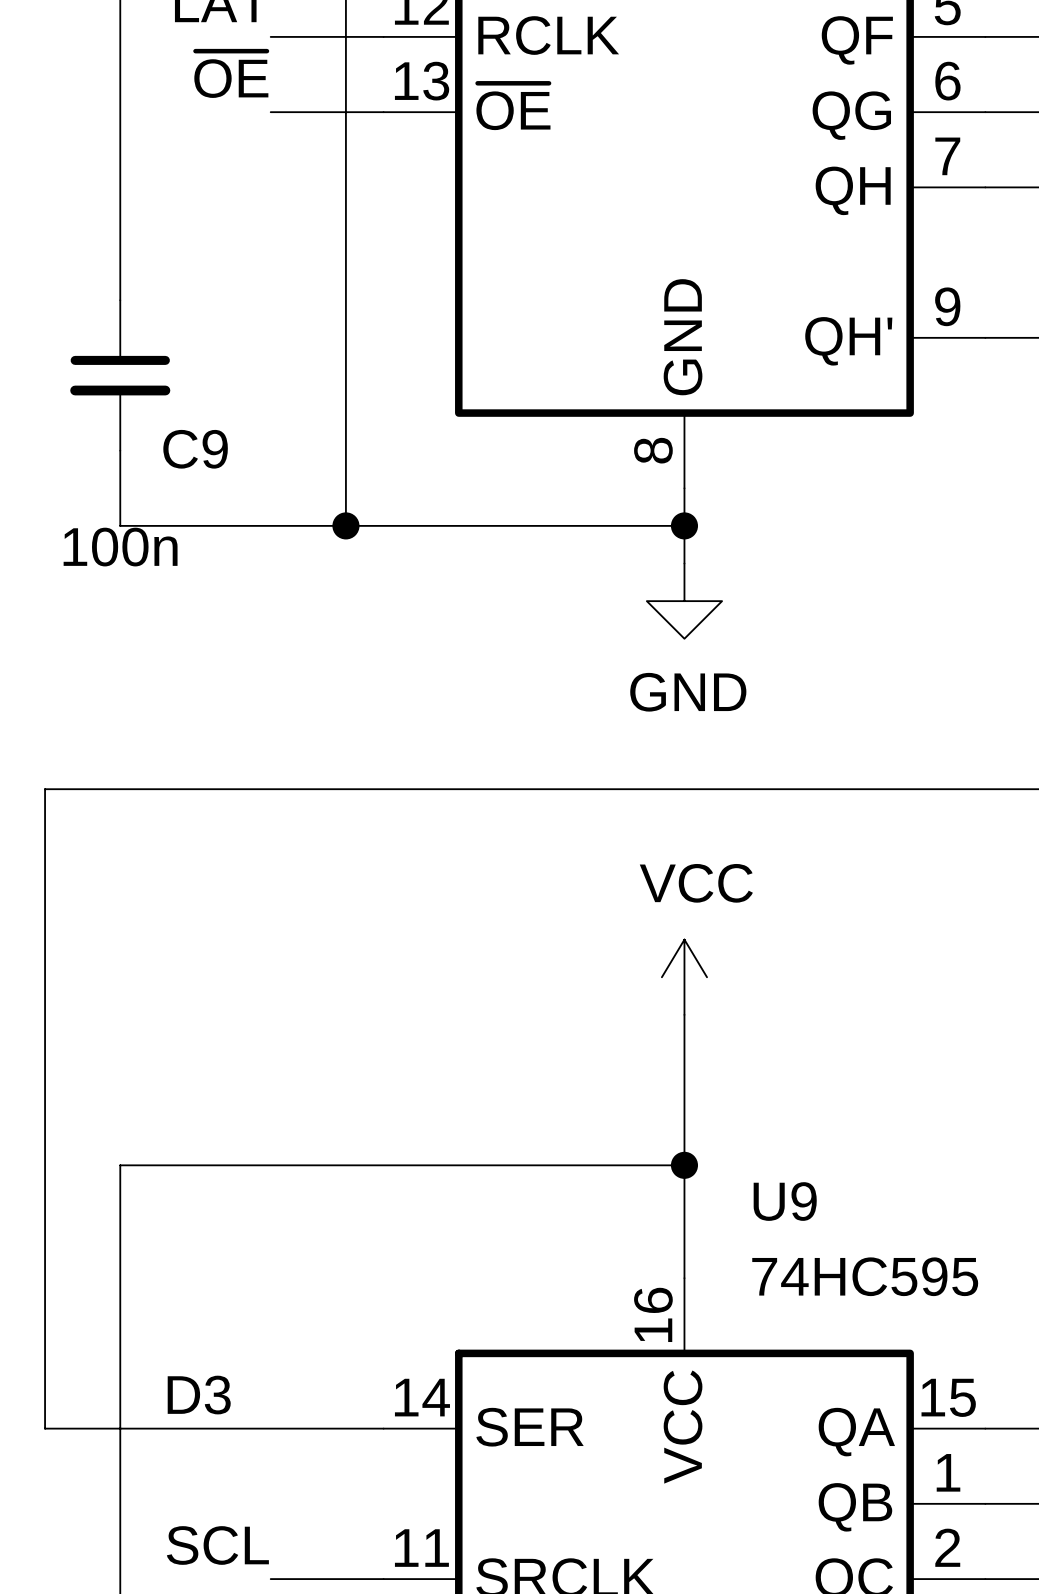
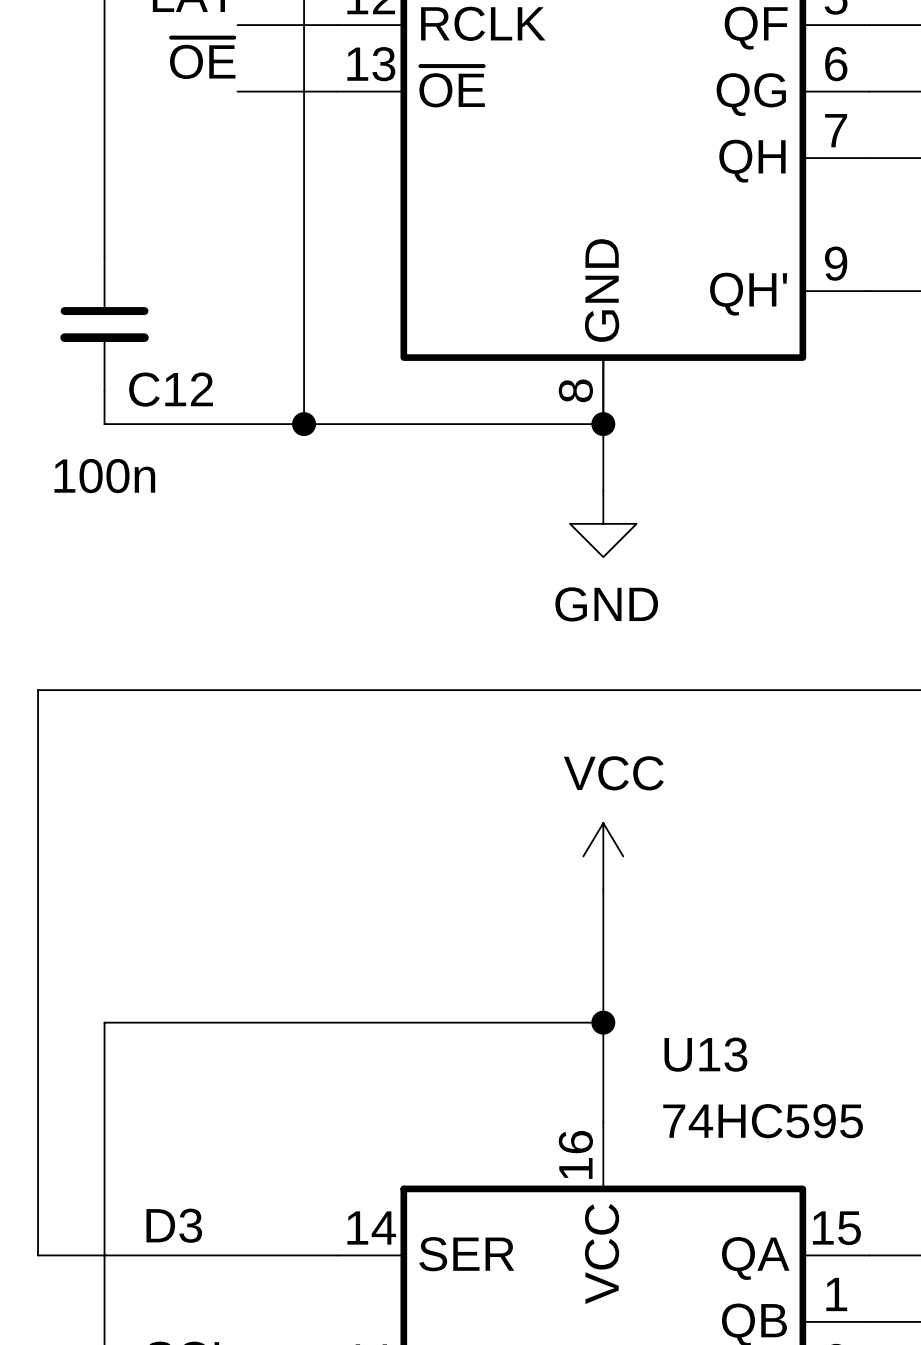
C9 name: C9 (195, 449) -> C12 (171, 389)
wire: (120, 488) (120, 525) (684, 525) -> (104, 424) (603, 424) (603, 357)
wire: (345, 488) (345, 525) -> none
junction position: (345, 525) -> (304, 424)
junction position: (684, 525) -> (603, 424)
U9 name: U9 (785, 1201) -> U13 (705, 1054)

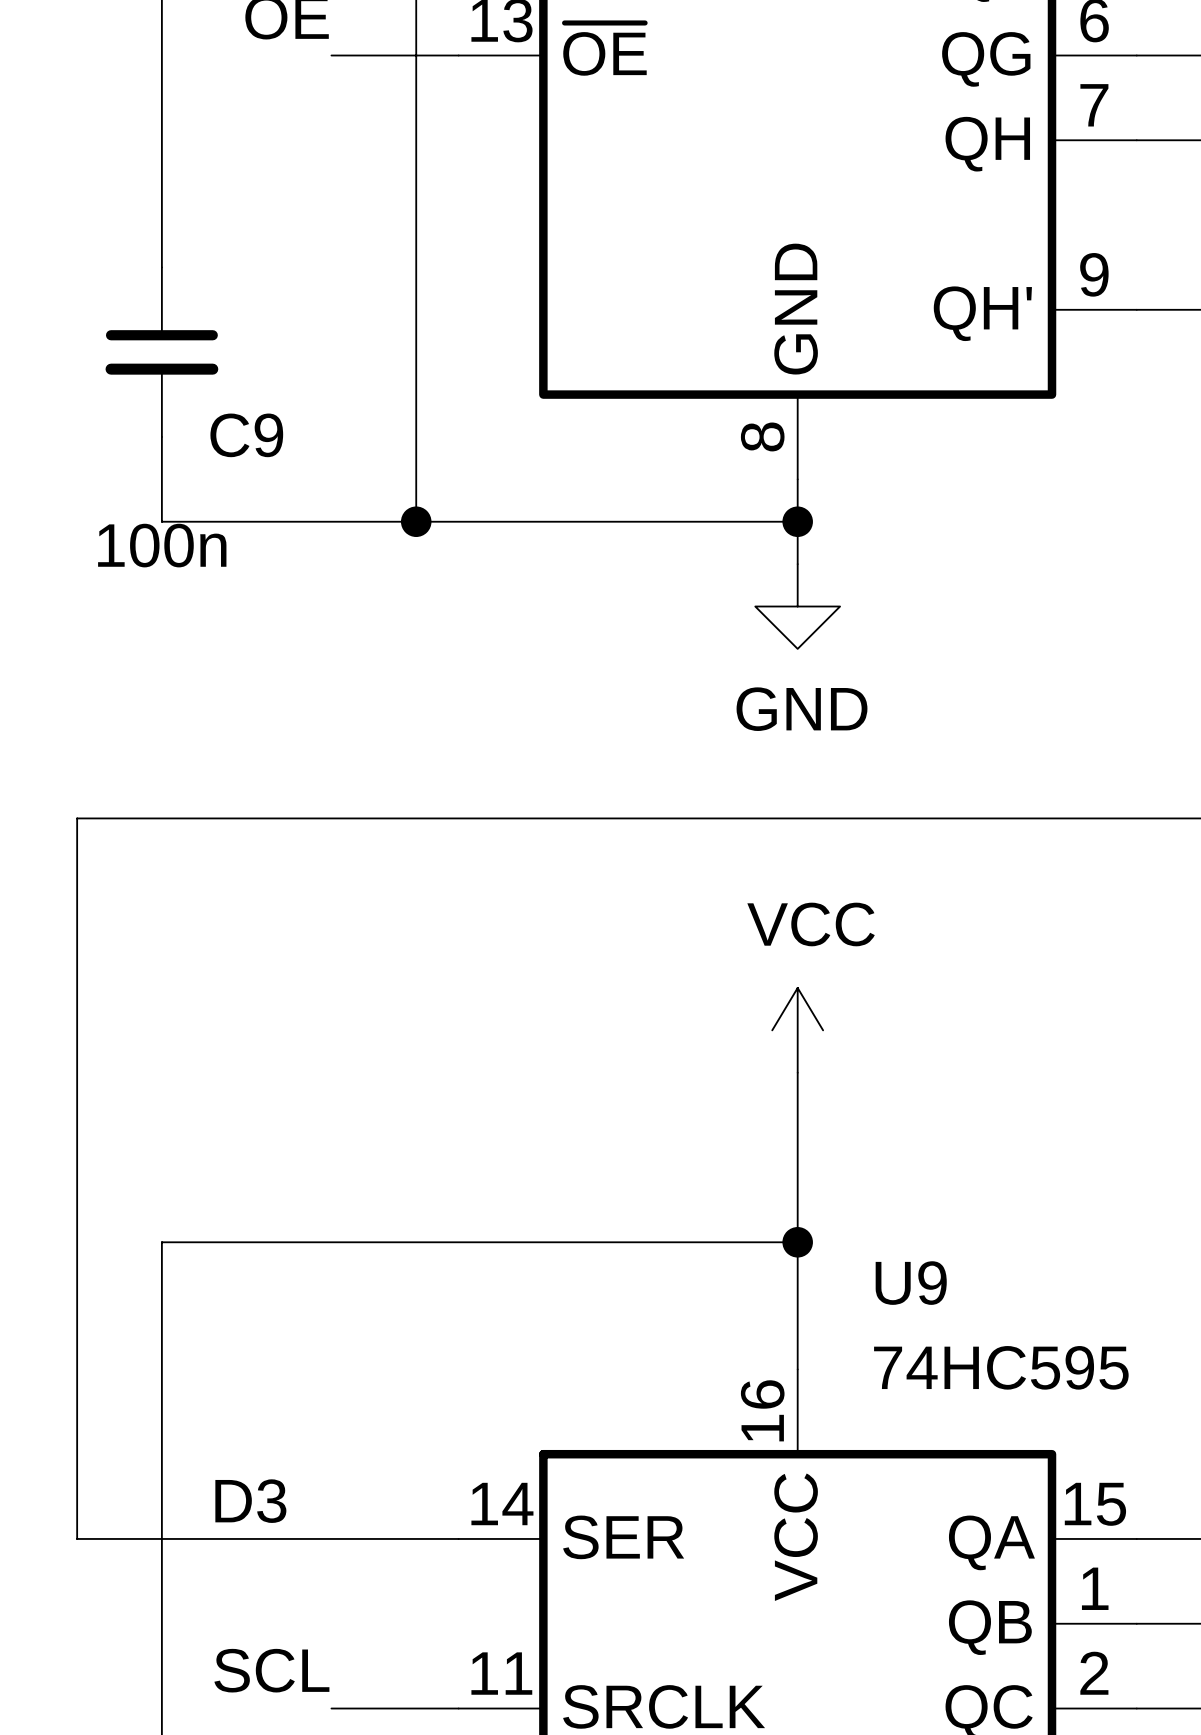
wire: (603, 357) (603, 424) (104, 424) -> (797, 521) (161, 521) (161, 479)
C12 name: C12 (171, 389) -> C9 (246, 435)
wire: none -> (416, 479) (416, 521)
junction position: (304, 424) -> (416, 521)
junction position: (603, 424) -> (797, 521)
U13 name: U13 (705, 1054) -> U9 (911, 1283)

